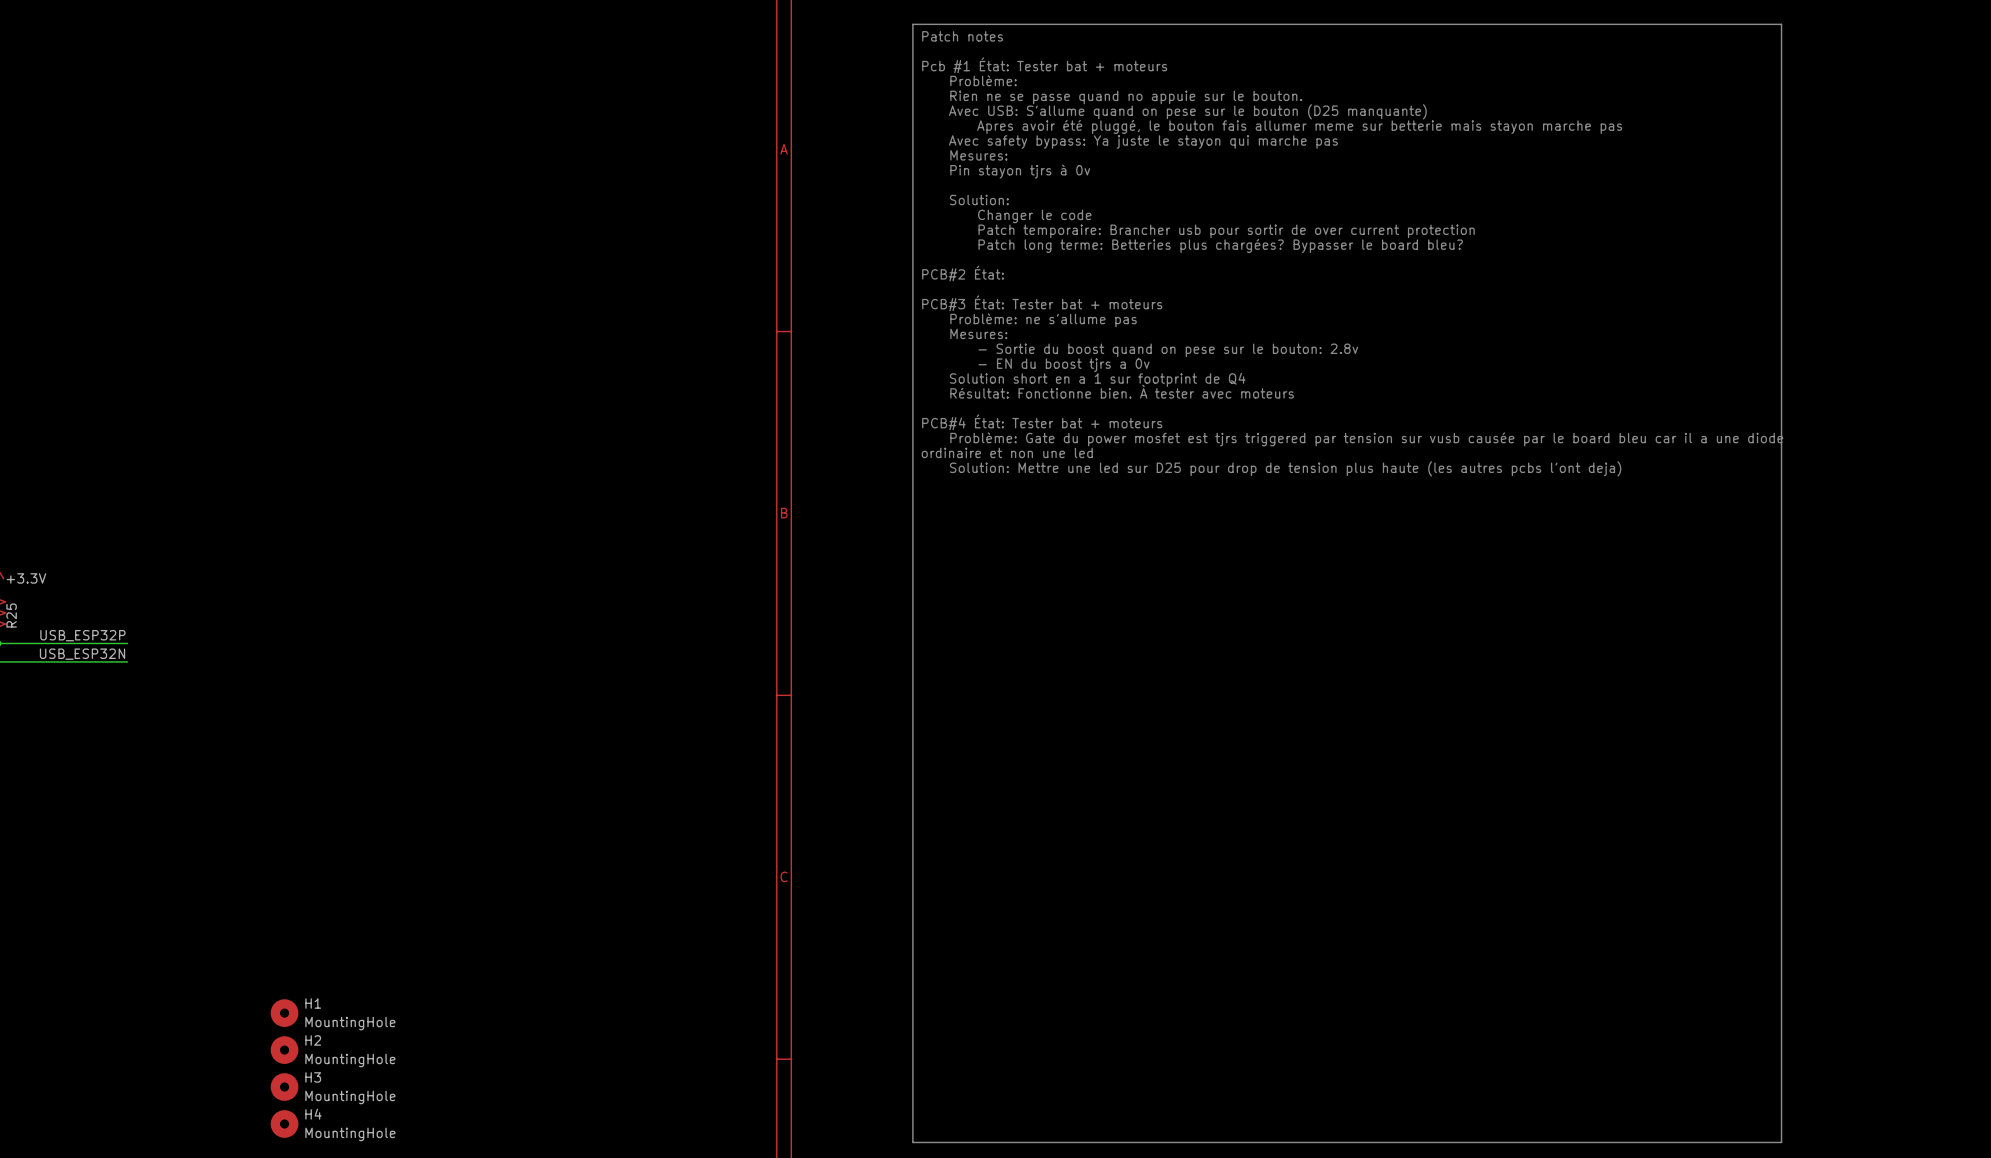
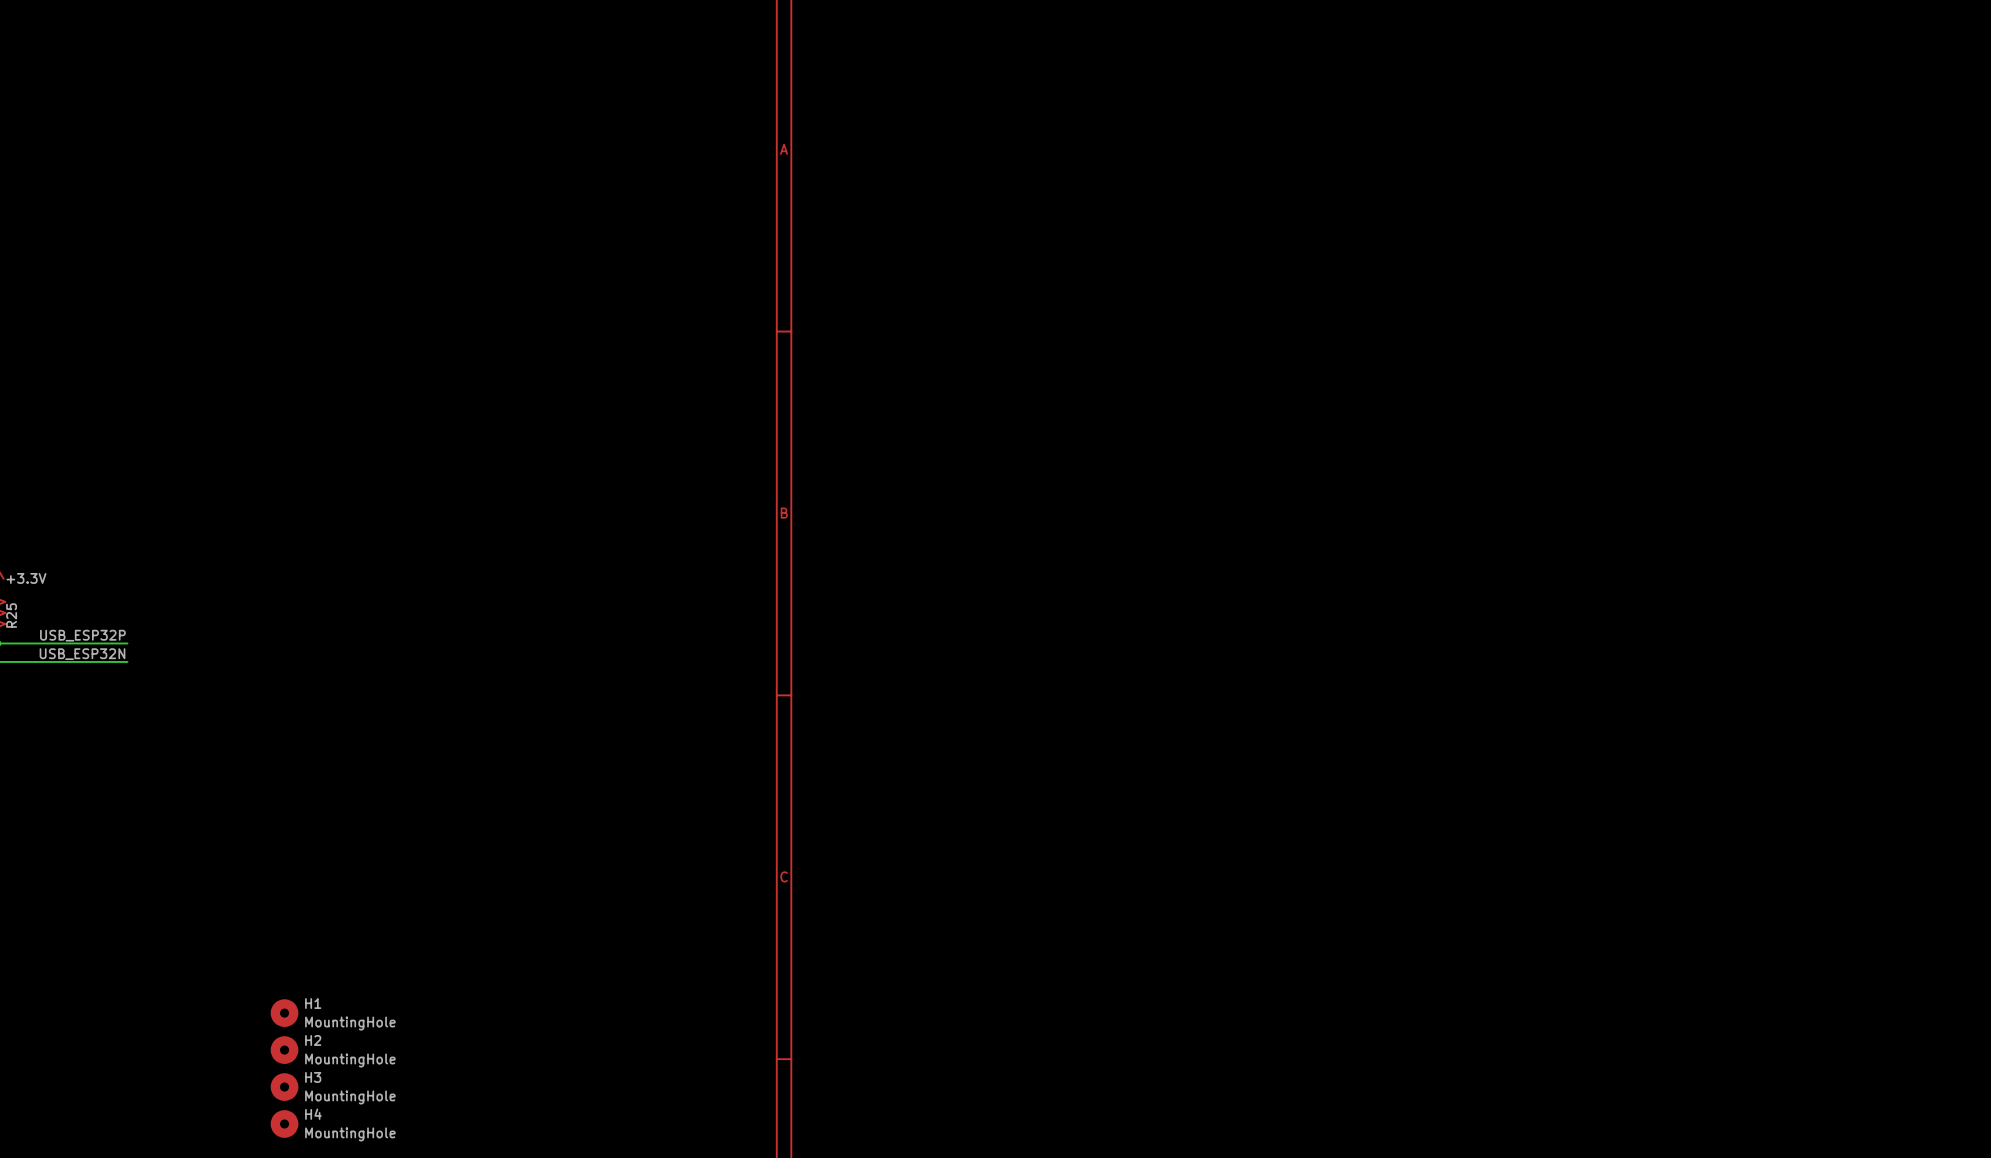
line: (912, 24) (1781, 24) (1781, 1142) (912, 1142) (912, 24) -> none
text: Patch notes (962, 36) -> none
text: Pcb #1 État: Tester bat + moteurs (1044, 65) -> none
text: Problème: (983, 80) -> none
text: Rien ne se passe quand no appuie sur le bouton. (1126, 97) -> none
text: Avec USB: S'allume quand on pese sur le bouton (D25 manquante) (1187, 111) -> none
text: Apres avoir été pluggé, le bouton fais allumer meme sur betterie mais stayon marche pas (1299, 126) -> none
text: Avec safety bypass: Ya juste le stayon qui marche pas (1143, 142) -> none
text: Mesures: (978, 155) -> none
text: Pin stayon tjrs à 0v (1020, 171) -> none
text: Solution: (979, 199) -> none
text: Changer le code (1034, 216) -> none
text: Patch temporaire: Brancher usb pour sortir de over current protection (1226, 231) -> none
text: Patch long terme: Betteries plus chargées? Bypasser le board bleu? (1220, 245) -> none
text: PCB#2 État: (963, 273) -> none
text: PCB#3 État: Tester bat + moteurs (1042, 303) -> none
text: Problème: ne s'allume pas (1043, 320) -> none
text: Mesures: (978, 333) -> none
text: - Sortie du boost quand on pese sur le bouton: 2.8v (1168, 350) -> none
text: - EN du boost tjrs a 0v (1064, 365) -> none
text: Solution short en a 1 sur footprint de Q4 (1097, 379) -> none
text: Résultat: Fonctionne bien. À tester avec moteurs (1122, 391) -> none
text: PCB#4 État: Tester bat + moteurs (1042, 422) -> none
text: Problème: Gate du power mosfet est tjrs triggered par tension sur vusb causée par le board bleu car il a une diode (1366, 439) -> none
text: ordinaire et non une led (1007, 452) -> none
text: Solution: Mettre une led sur D25 pour drop de tension plus haute (les autres pcbs l'ont deja) (1285, 468) -> none

